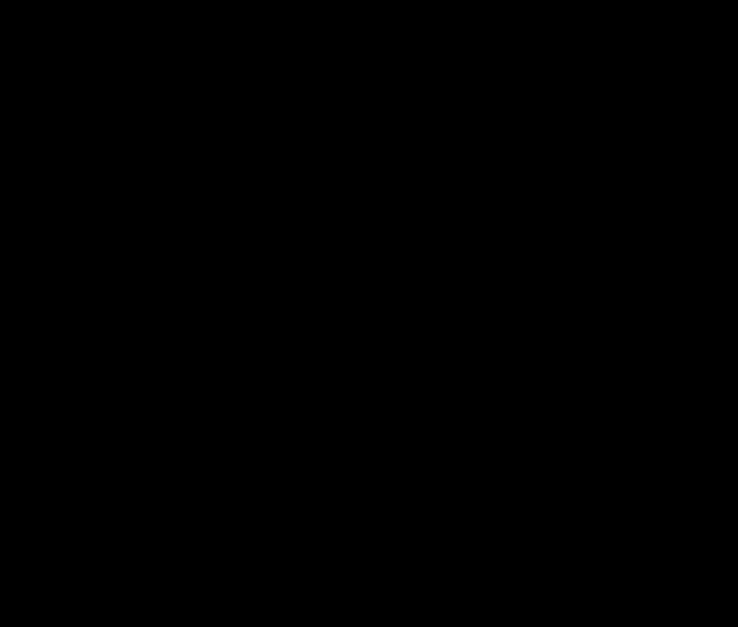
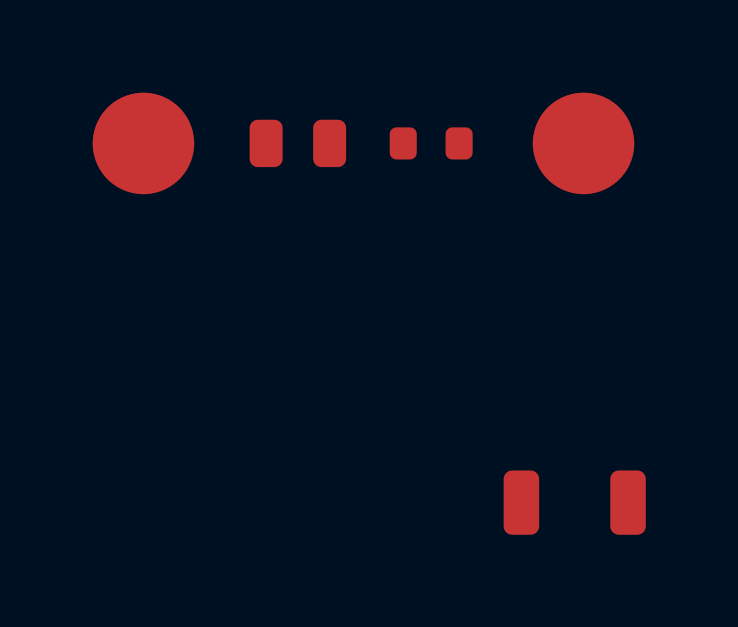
part: none -> (143, 143)
part: none -> (297, 143)
part: none -> (431, 143)
part: none -> (583, 143)
part: none -> (574, 502)

